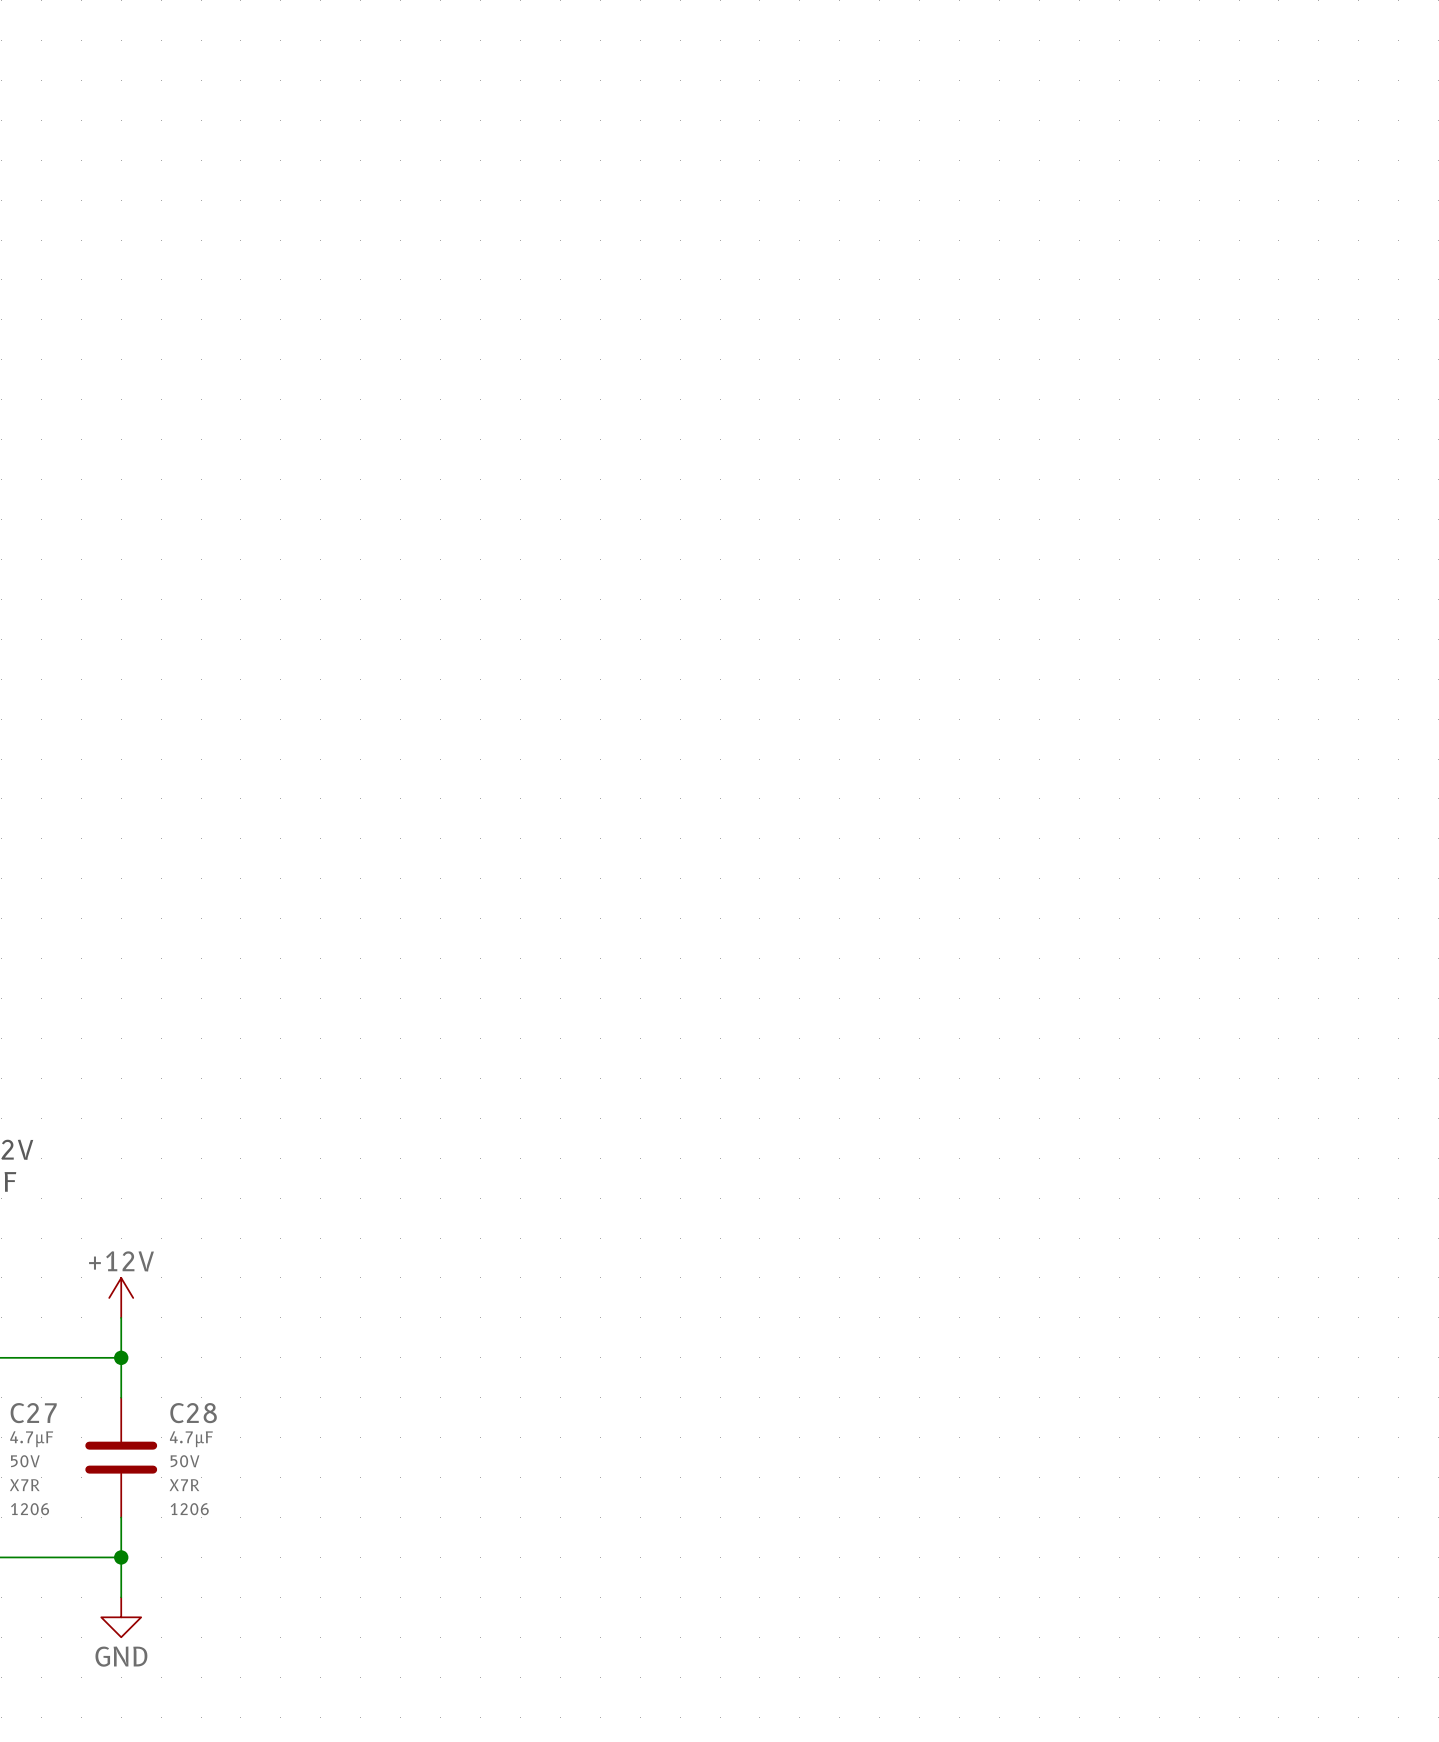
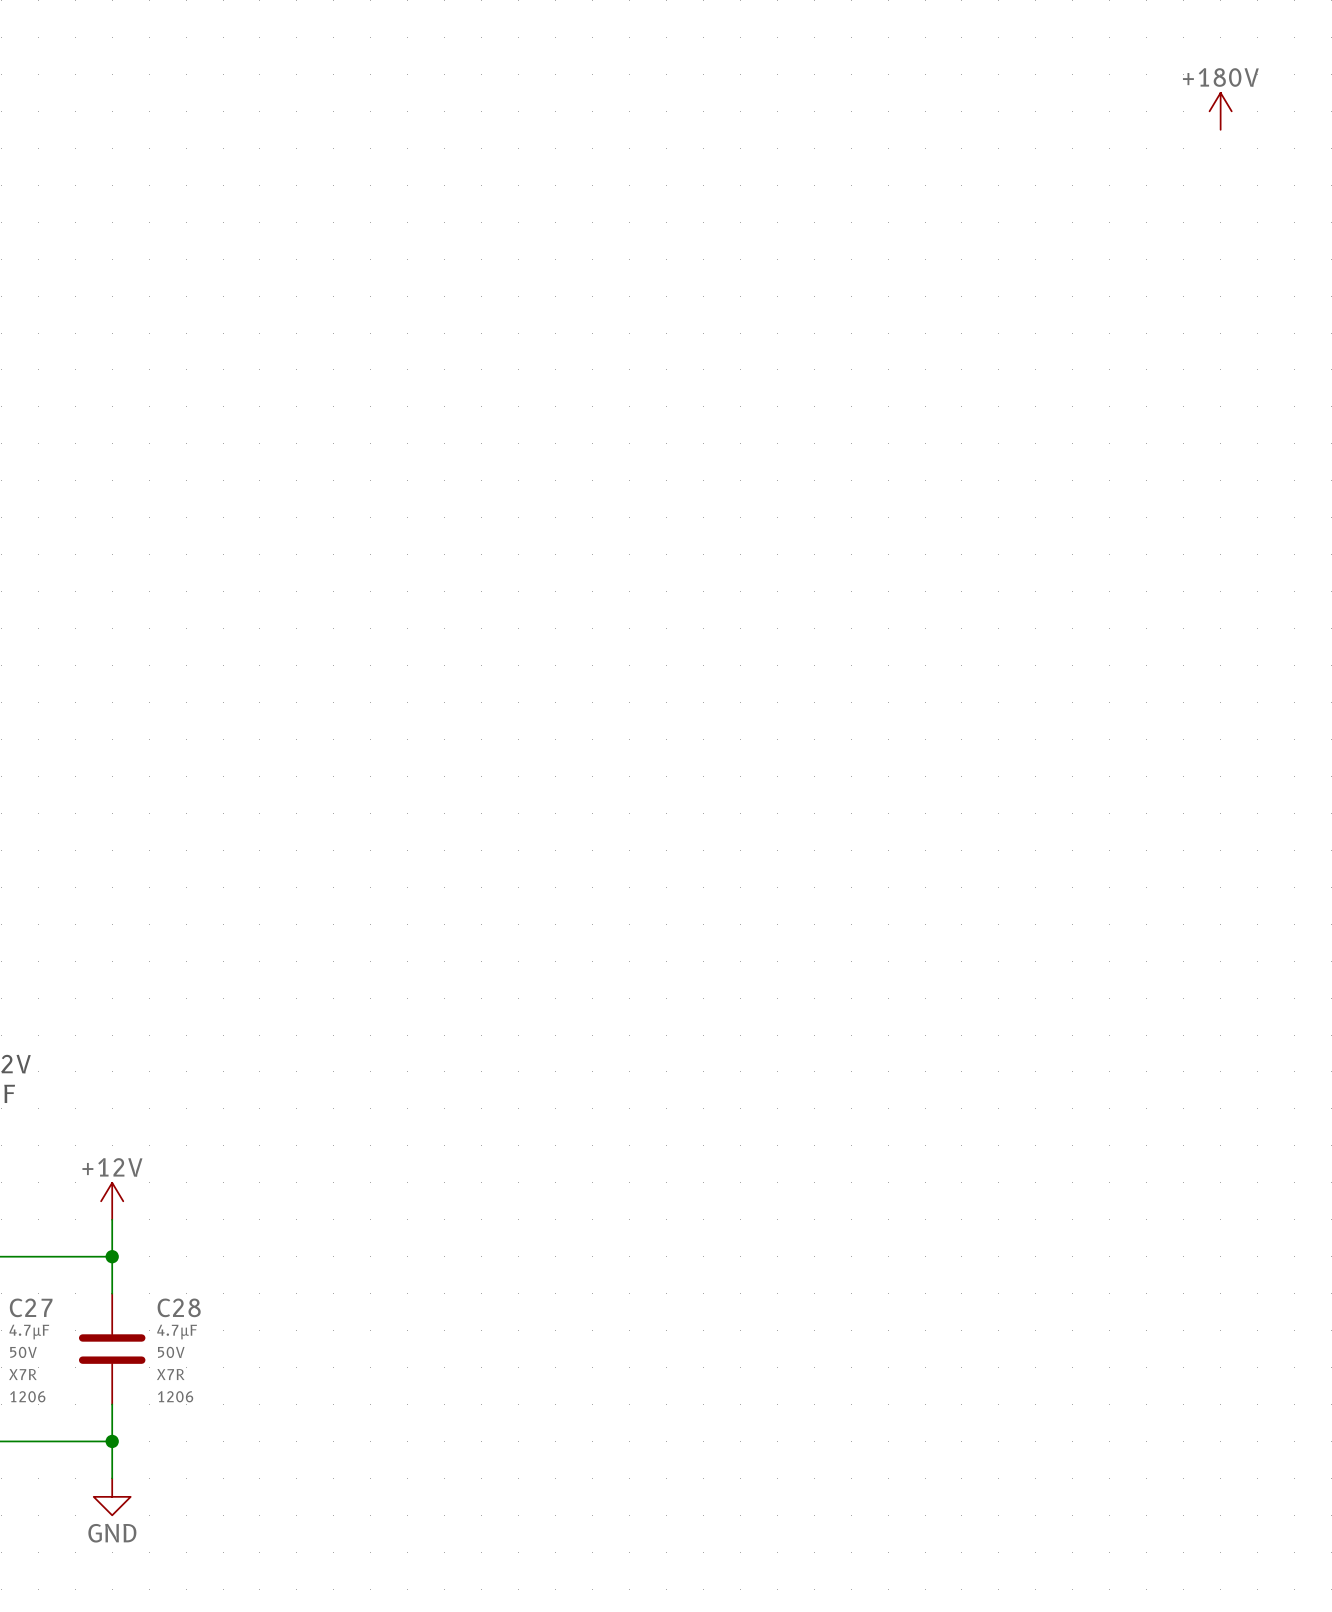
power symbol: none -> +180V (1220, 111)

